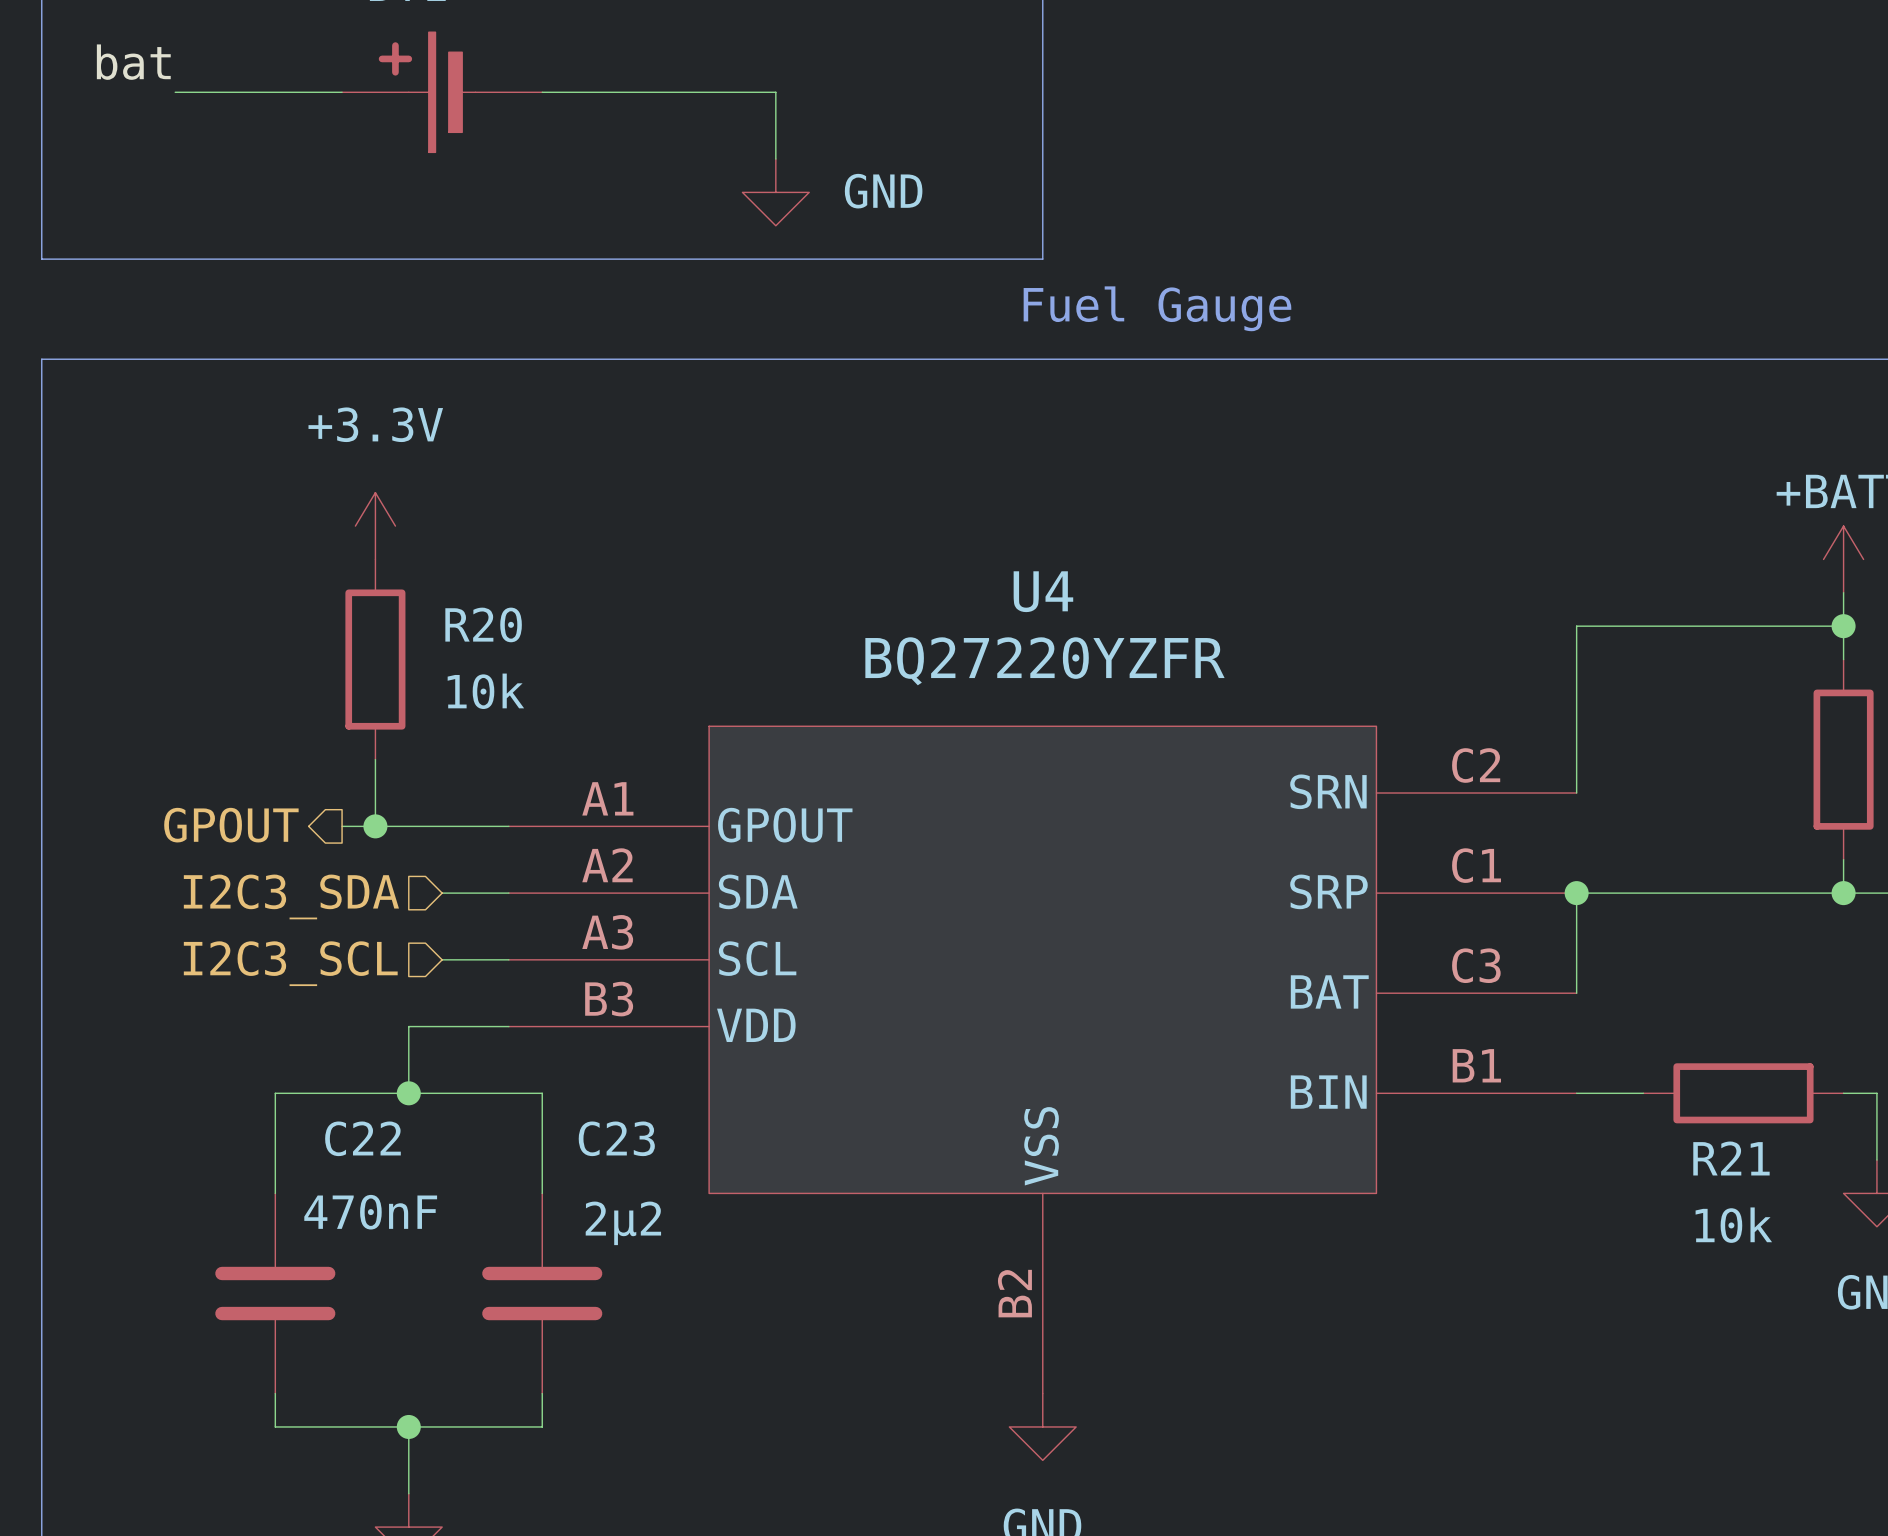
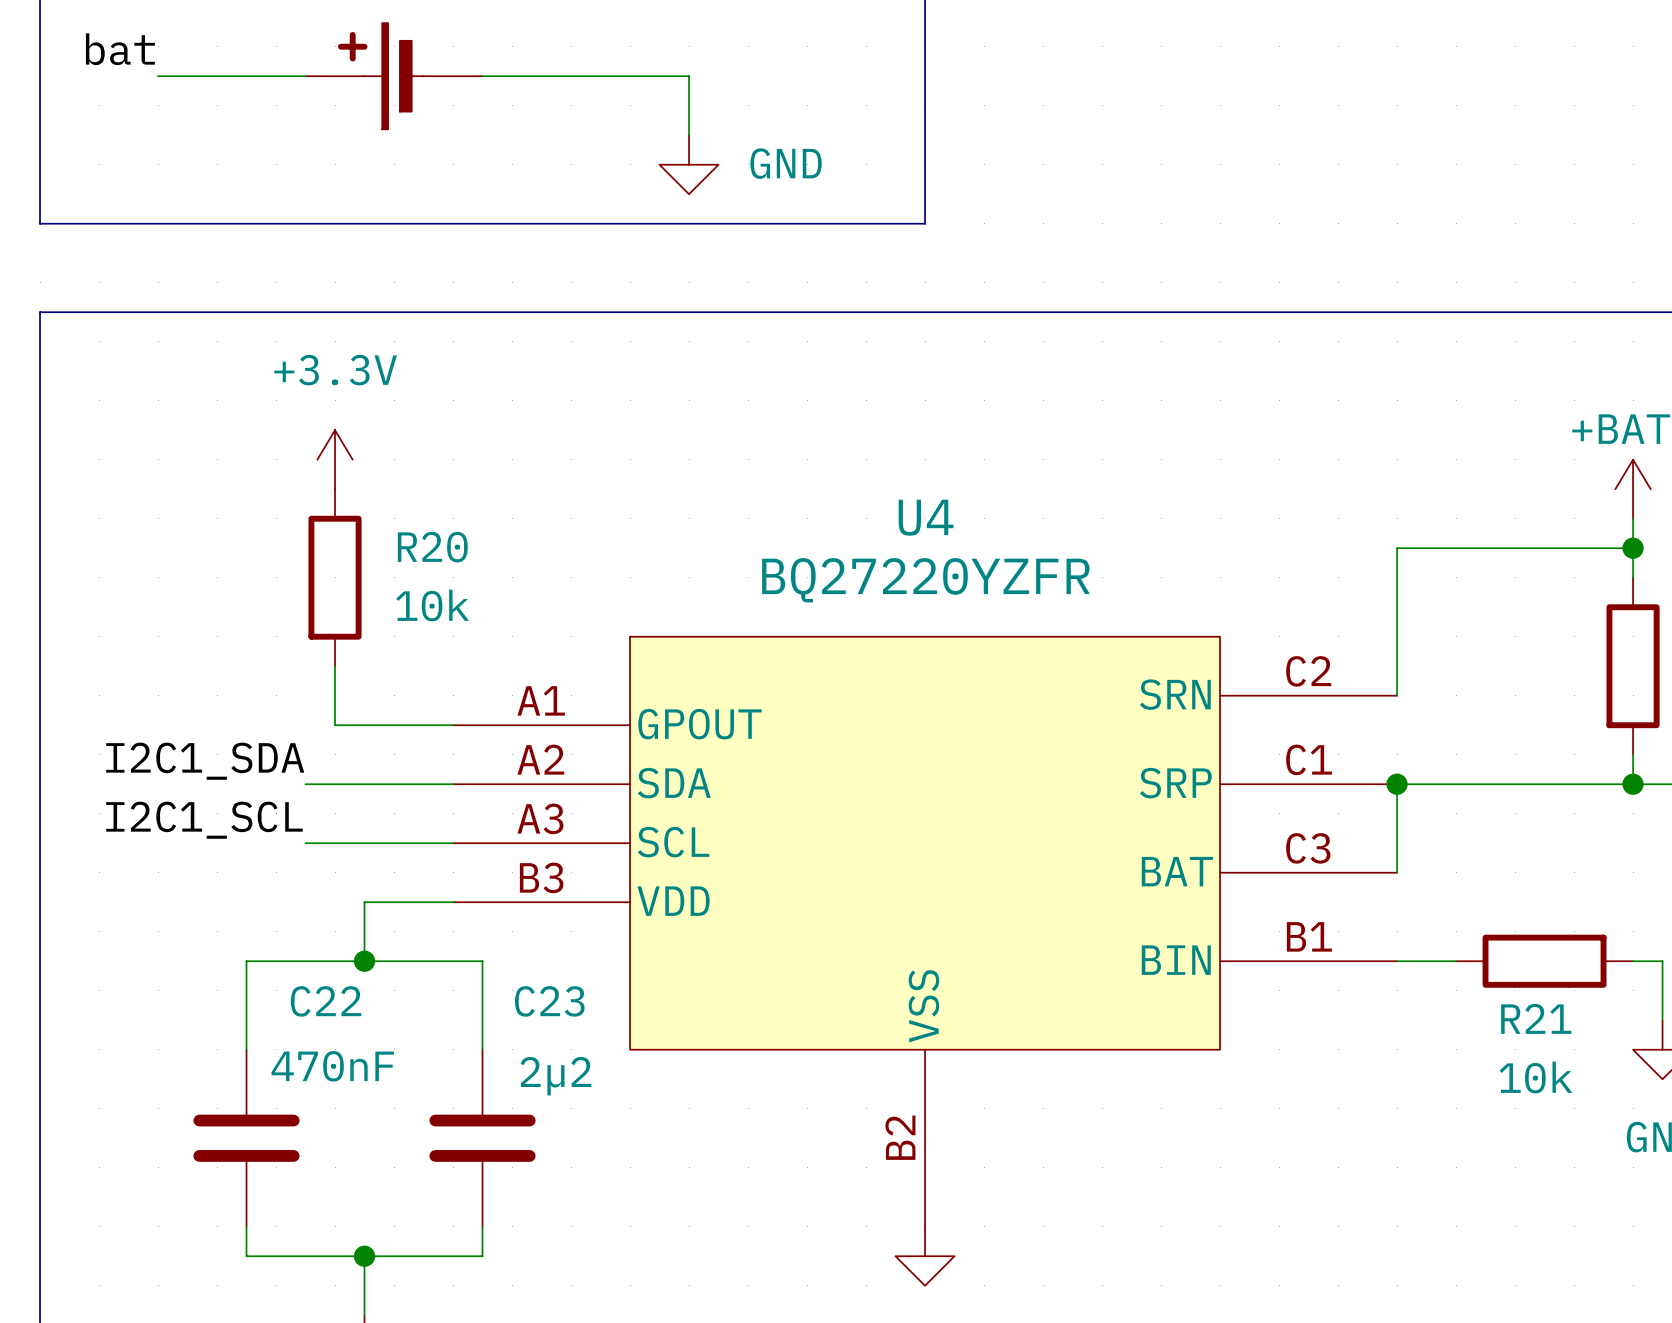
text: Fuel Gauge (1157, 308) -> none
hierarchical label: GPOUT (231, 825) -> none
wire: (342, 826) (375, 826) -> none
junction: (375, 826) -> none
label: none -> I2C1_SDA (205, 761)
wire: none -> (305, 784) (394, 784)
hierarchical label: I2C3_SDA (291, 896) -> none
label: none -> I2C1_SCL (204, 820)
wire: none -> (305, 843) (394, 843)
hierarchical label: I2C3_SCL (290, 963) -> none

